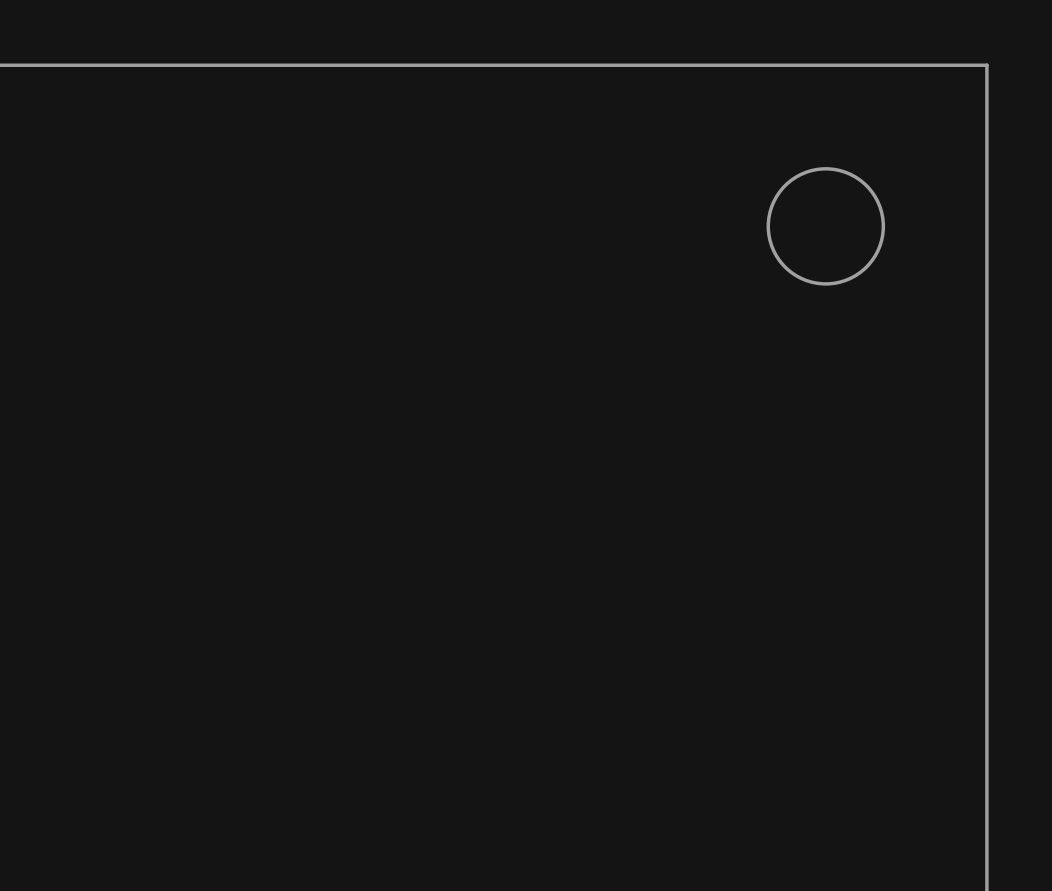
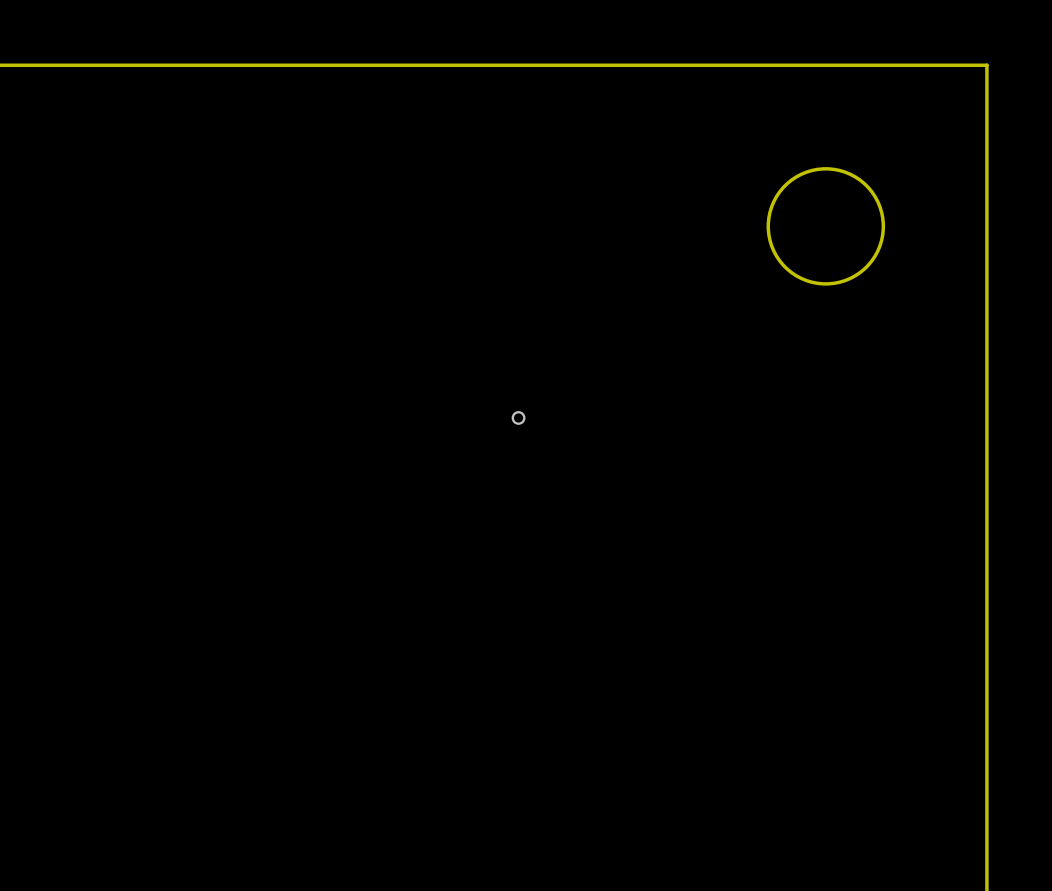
via: none -> (518, 417)

